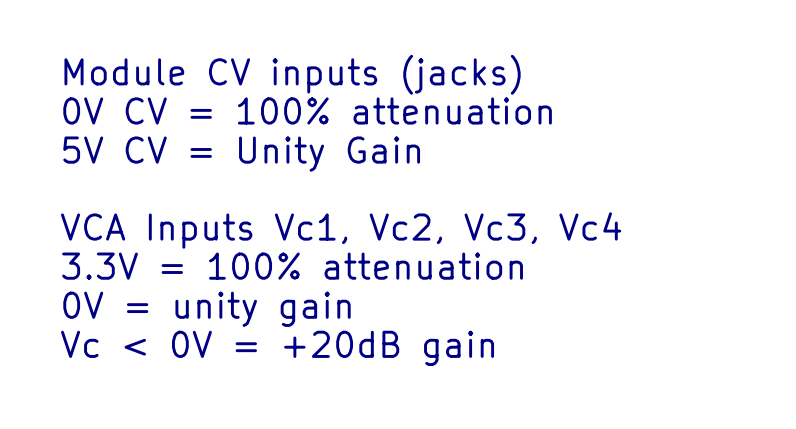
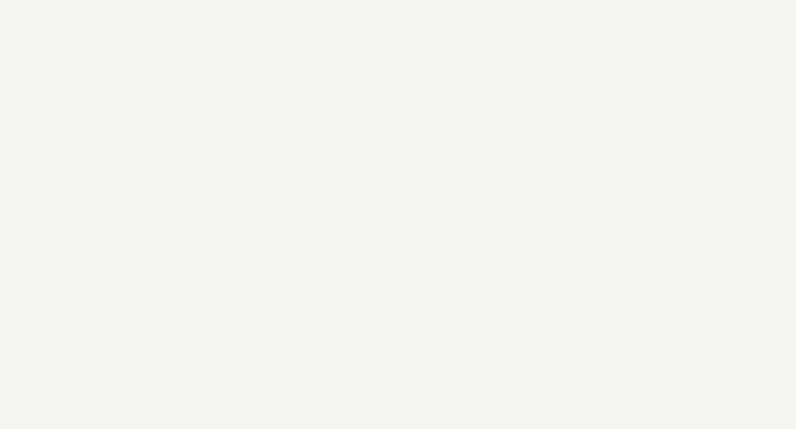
text: Module CV inputs (jacks) (292, 74) -> none
text: 0V CV = 100% attenuation (307, 110) -> none
text: 5V CV = Unity Gain (241, 154) -> none
text: VCA Inputs Vc1, Vc2, Vc3, Vc4 (341, 230) -> none
text: 3.3V = 100% attenuation (292, 266) -> none
text: 0V = unity gain (206, 309) -> none
text: Vc < 0V = +20dB gain (277, 348) -> none

